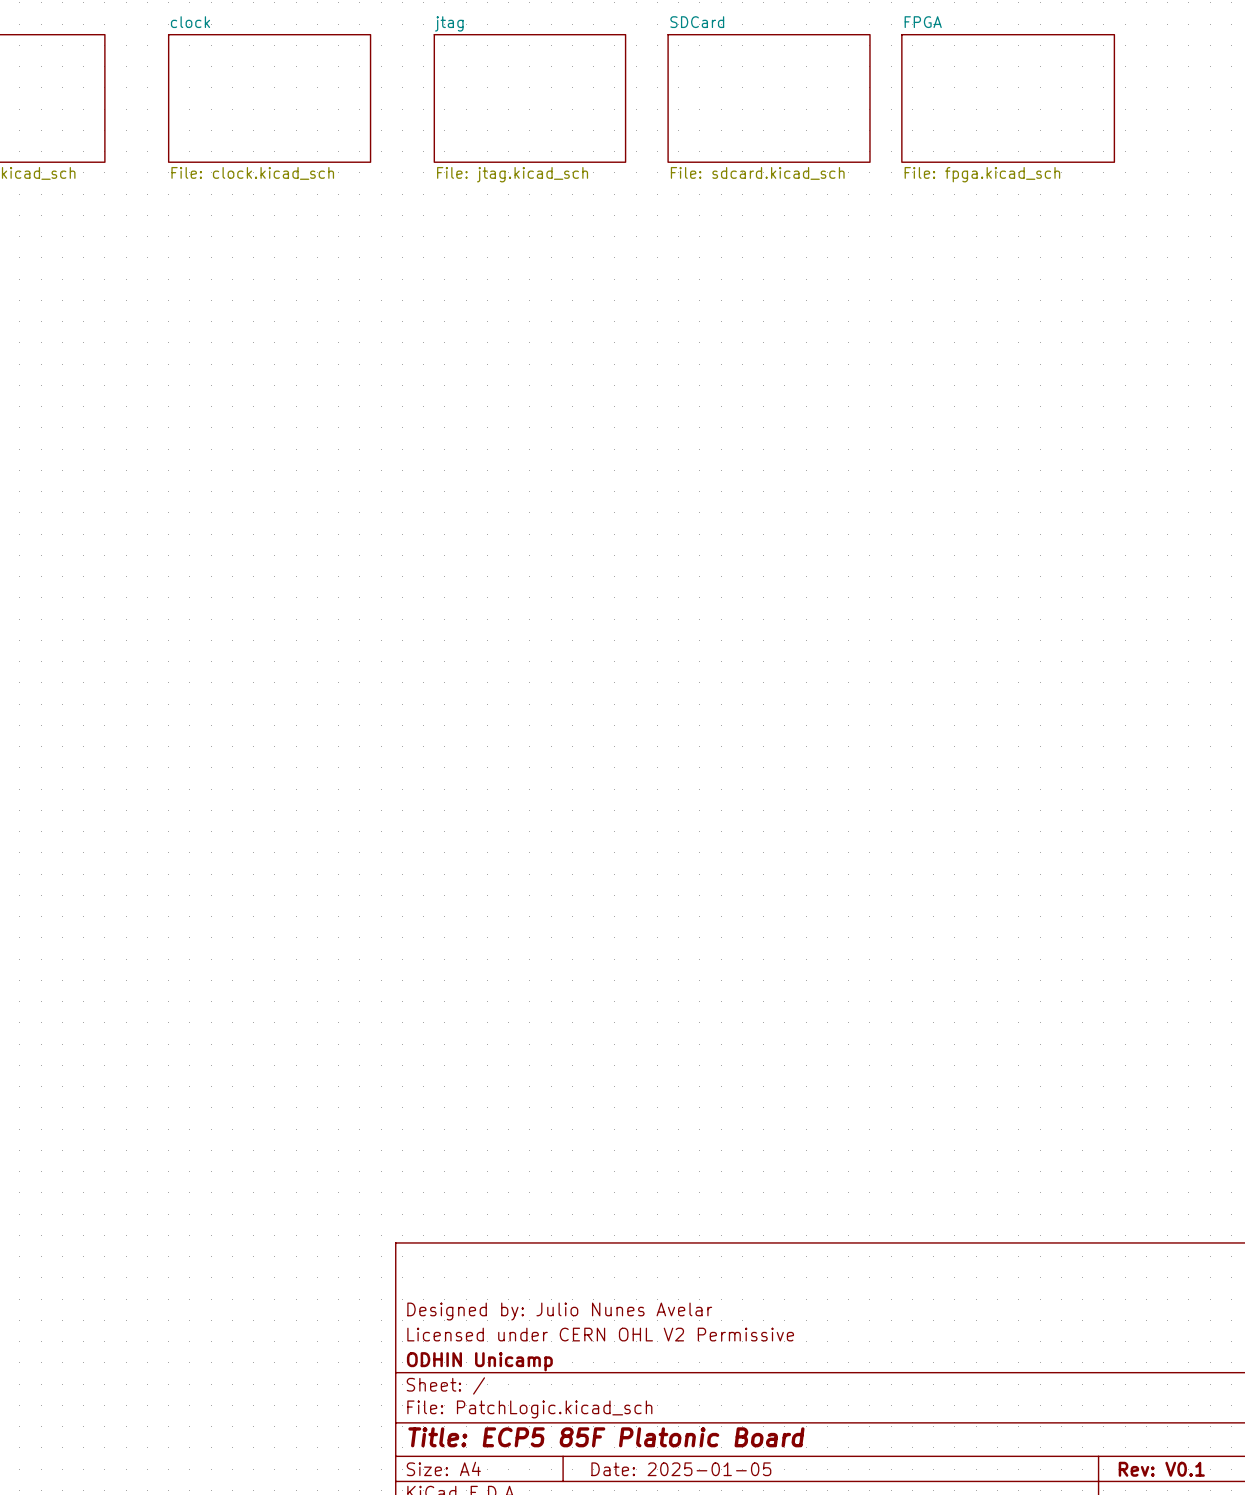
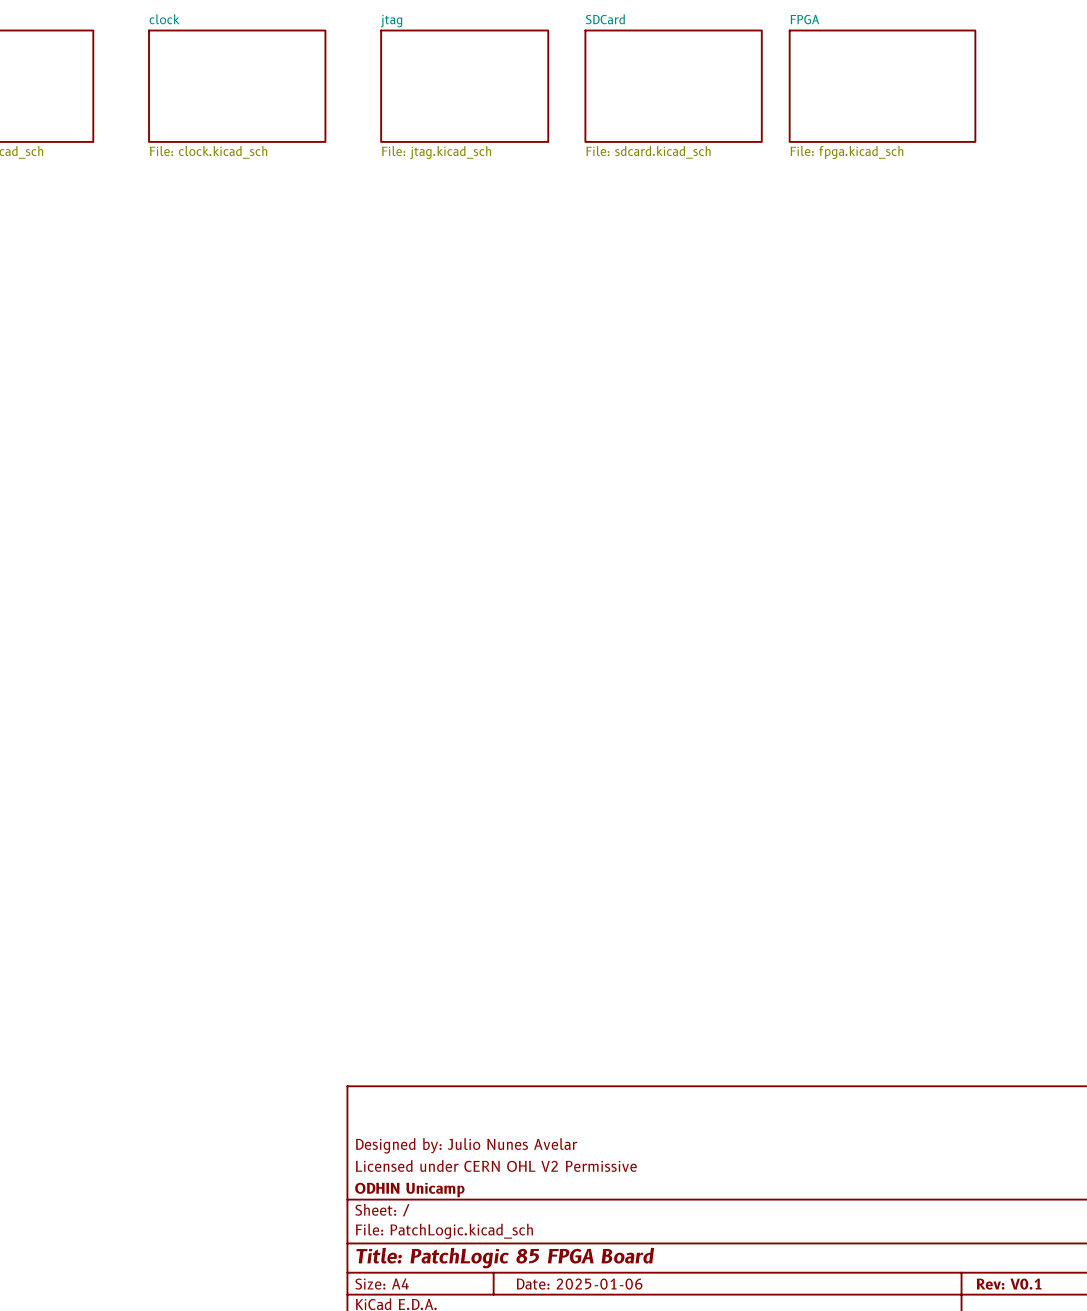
title block: Title: ECP5 85F Platonic Board (606, 1437) -> Title: PatchLogic 85 FPGA Board (505, 1258)
title block: Date: 2025-01-05 (681, 1469) -> Date: 2025-01-06 (579, 1284)

